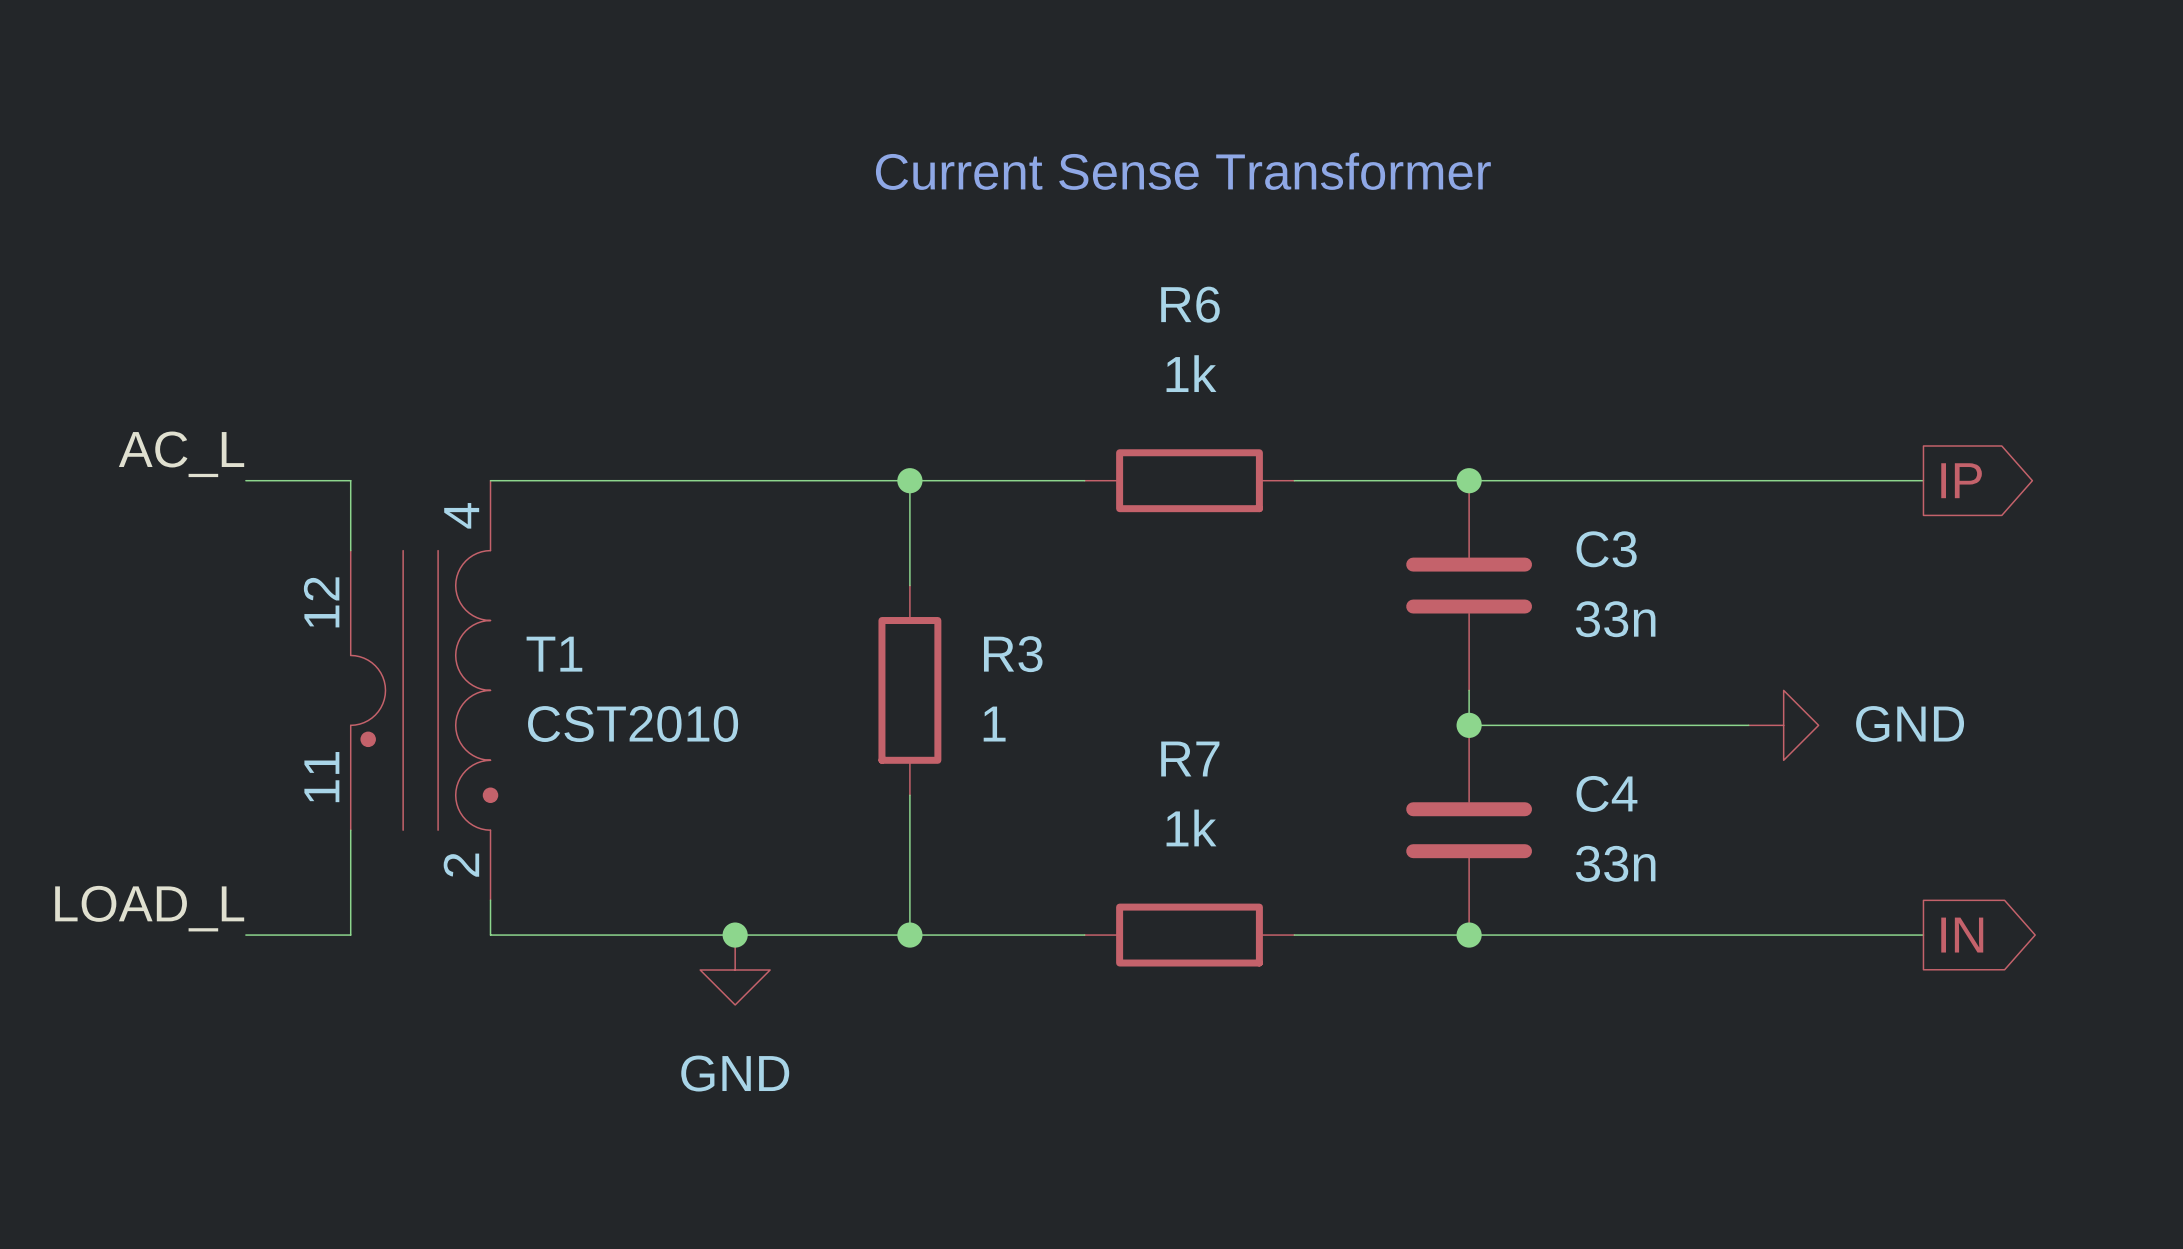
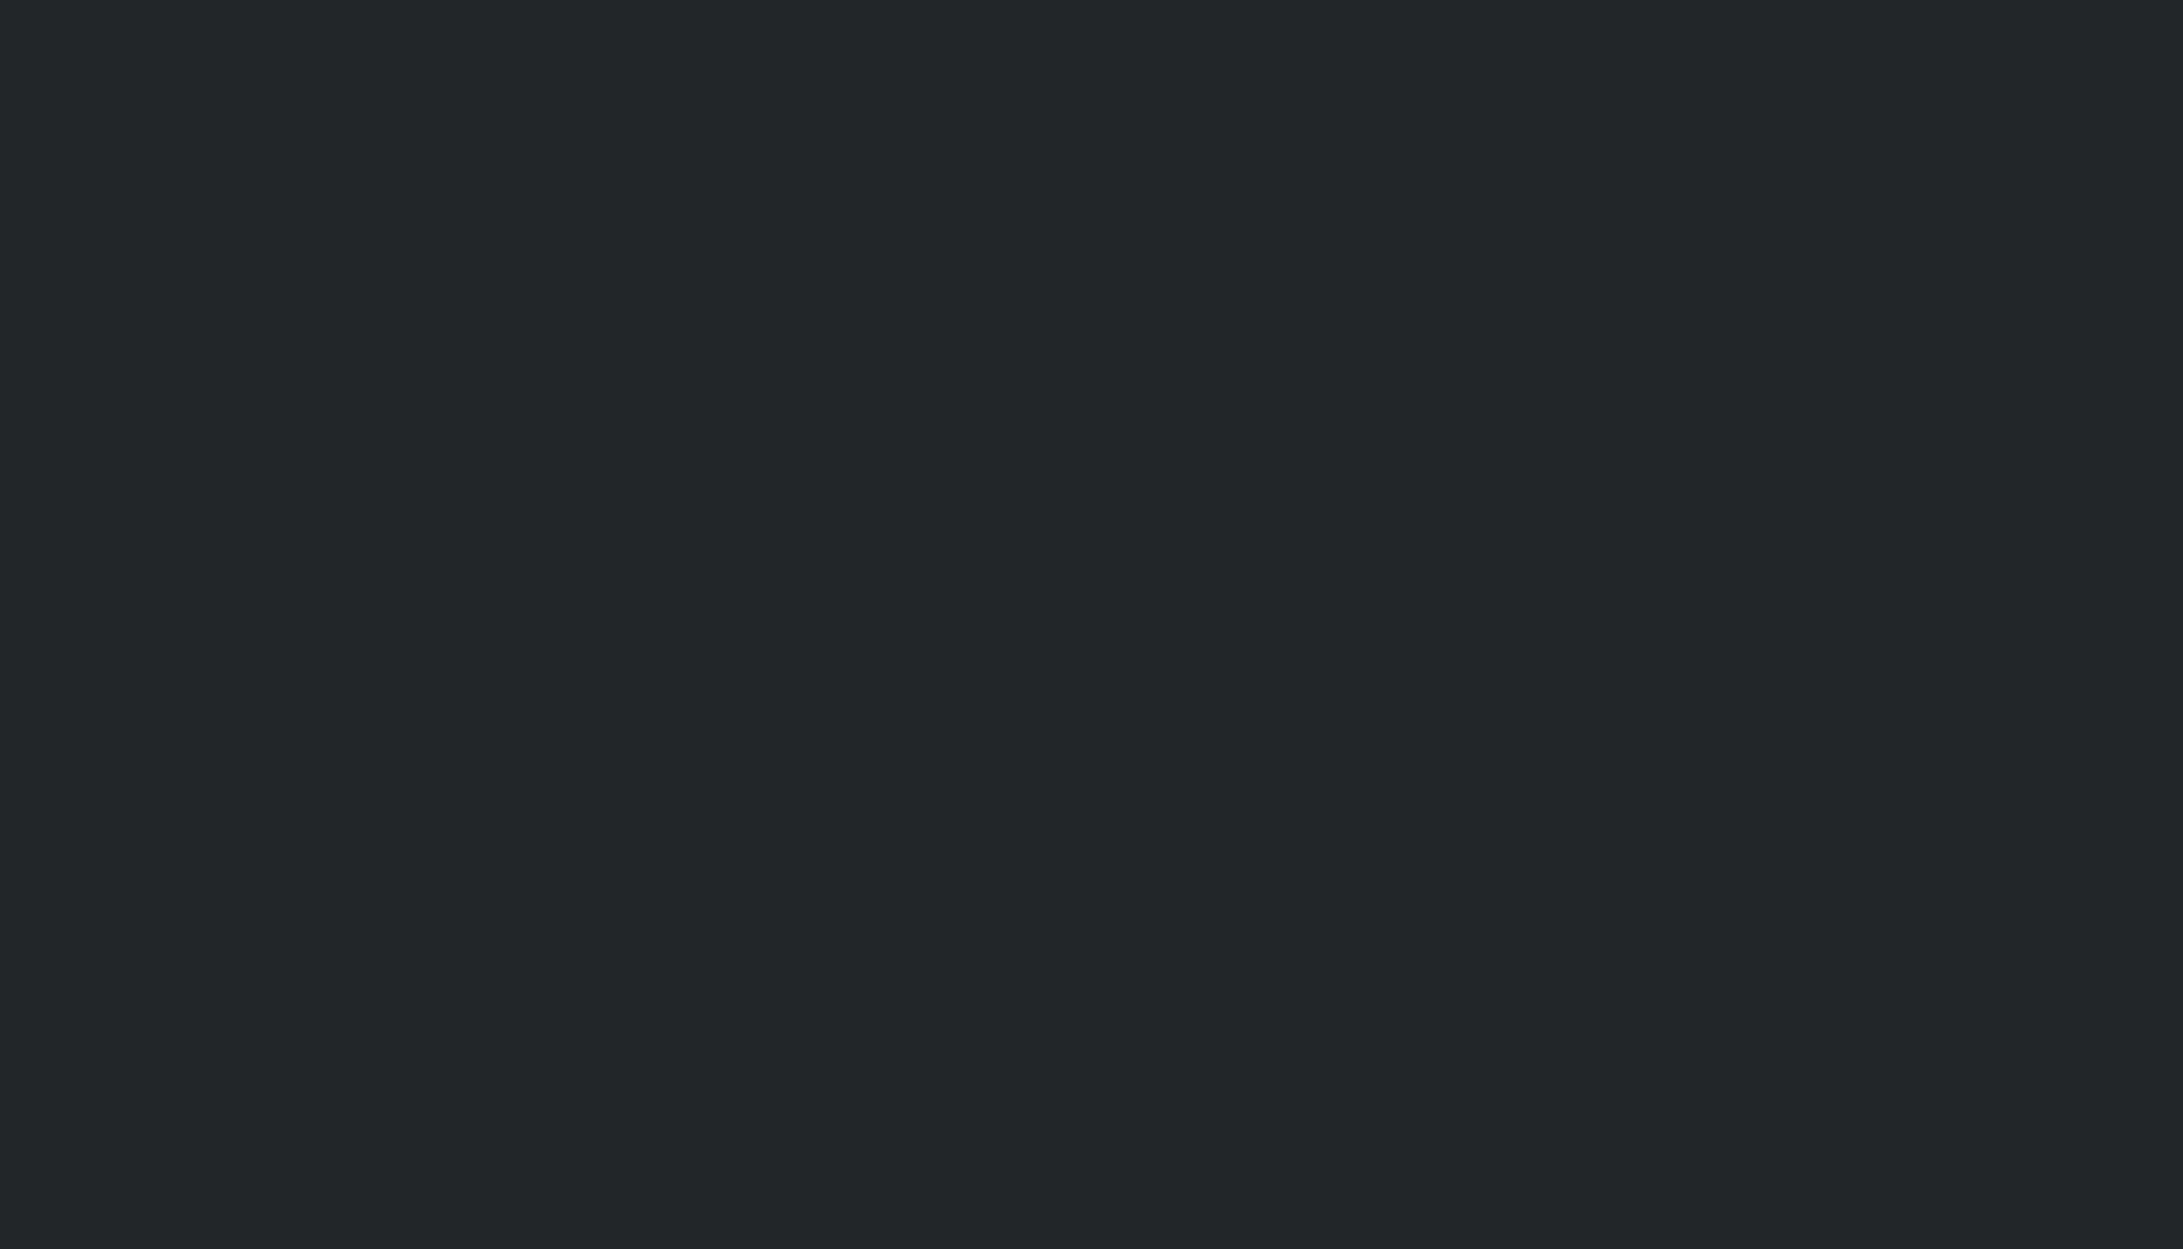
text: Current Sense Transformer (1183, 171) -> none
label: AC_L (181, 454) -> none
wire: (245, 480) (350, 480) (350, 550) -> none
wire: (490, 480) (1084, 480) -> none
wire: (909, 480) (909, 585) -> none
junction: (909, 480) -> none
R6: 1k (1189, 480) -> none
wire: (1294, 480) (1923, 480) -> none
junction: (1469, 480) -> none
global label: IP (1961, 480) -> none
C3: 33n (1469, 585) -> none
T1: CST2010 (424, 690) -> none
R3: 1 (909, 690) -> none
wire: (1469, 690) (1469, 725) (1748, 725) -> none
junction: (1469, 725) -> none
power symbol: GND (1783, 725) -> none
wire: (909, 795) (909, 935) -> none
wire: (350, 830) (350, 935) (245, 935) -> none
C4: 33n (1469, 830) -> none
wire: (490, 900) (490, 935) (1084, 935) -> none
label: LOAD_L (149, 908) -> none
junction: (735, 935) -> none
junction: (909, 935) -> none
R7: 1k (1189, 935) -> none
wire: (1294, 935) (1923, 935) -> none
junction: (1469, 935) -> none
global label: IN (1962, 935) -> none
power symbol: GND (735, 970) -> none

